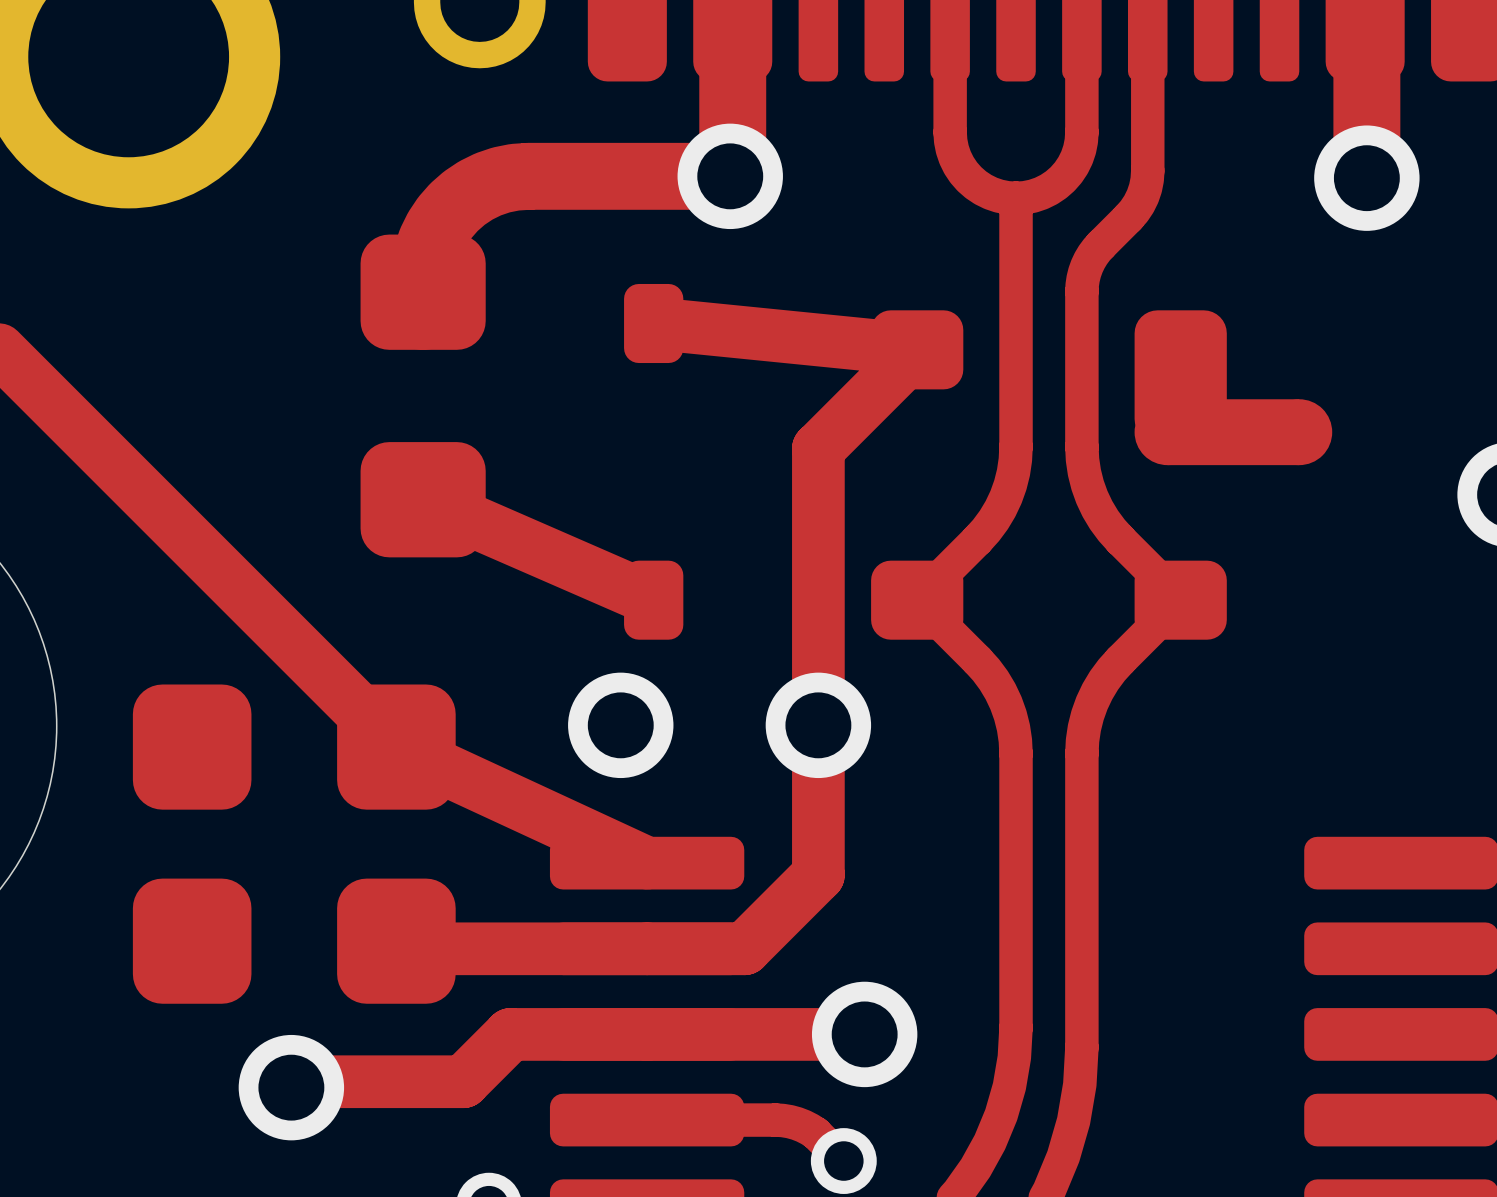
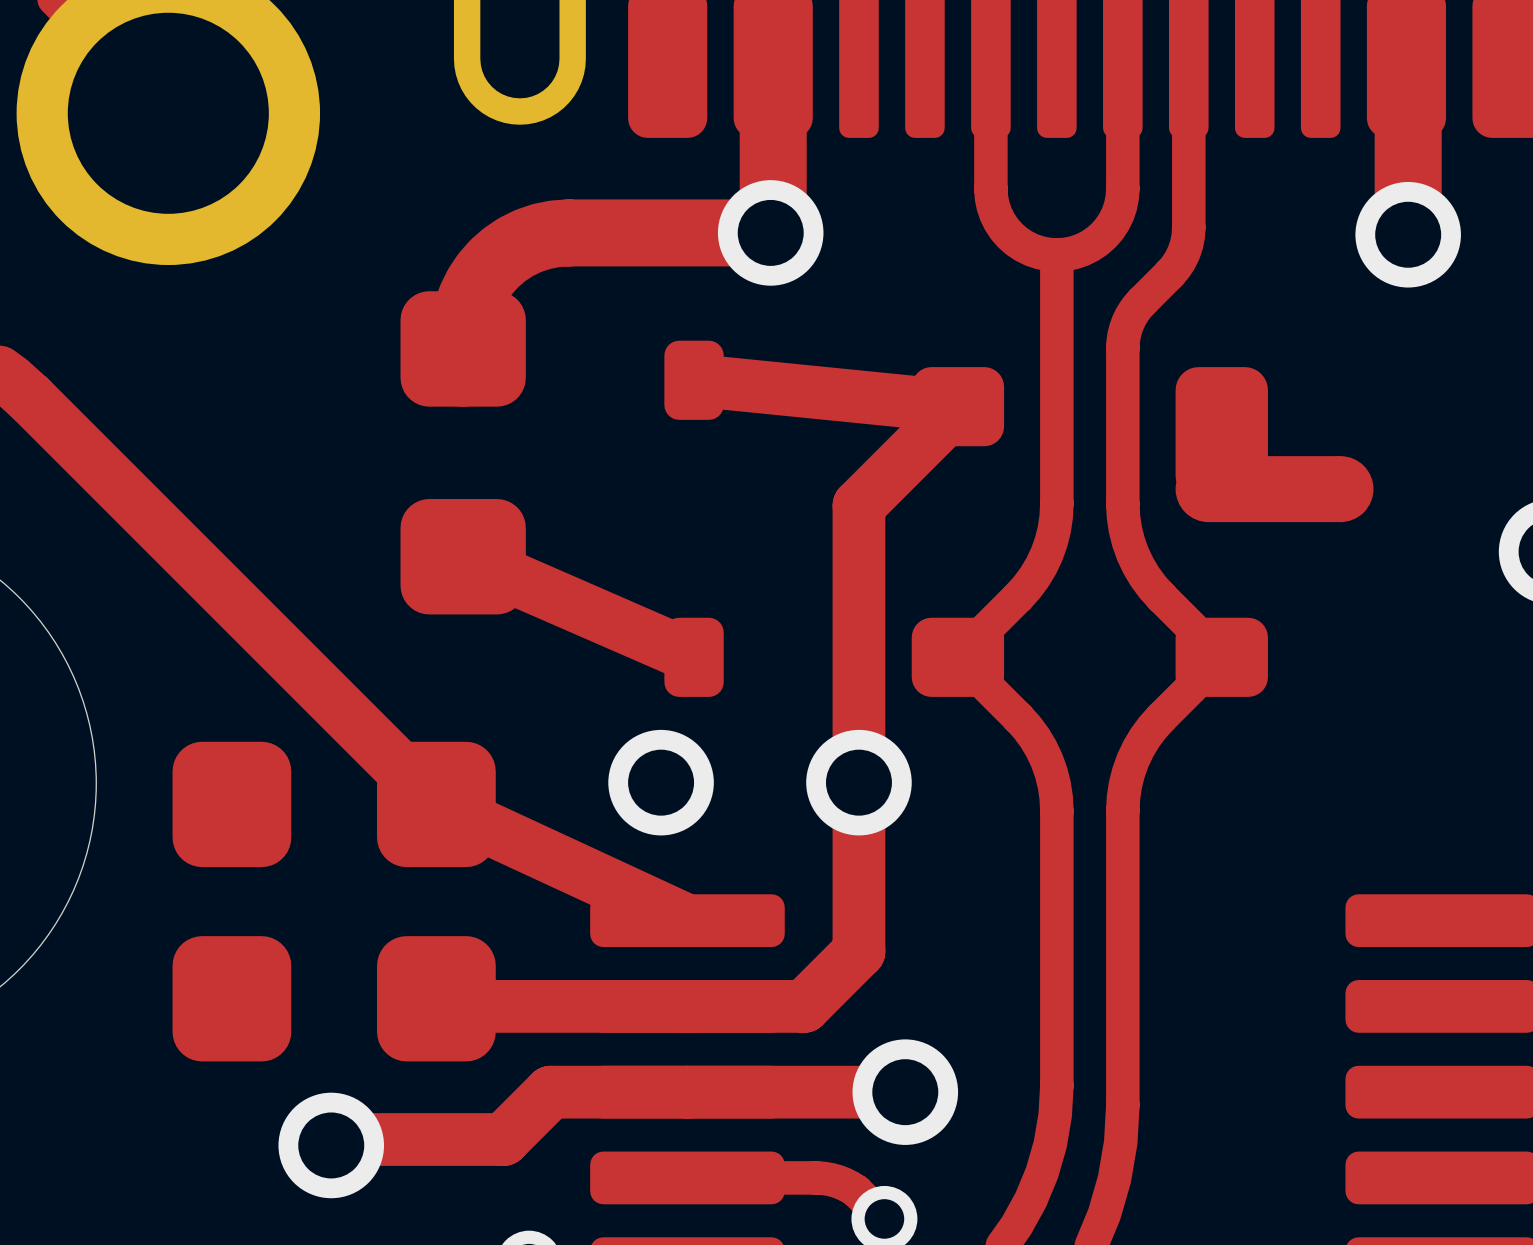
top track: (818, 874) (744, 948) -> (858, 932) (858, 951) (804, 1006) (784, 1006)

